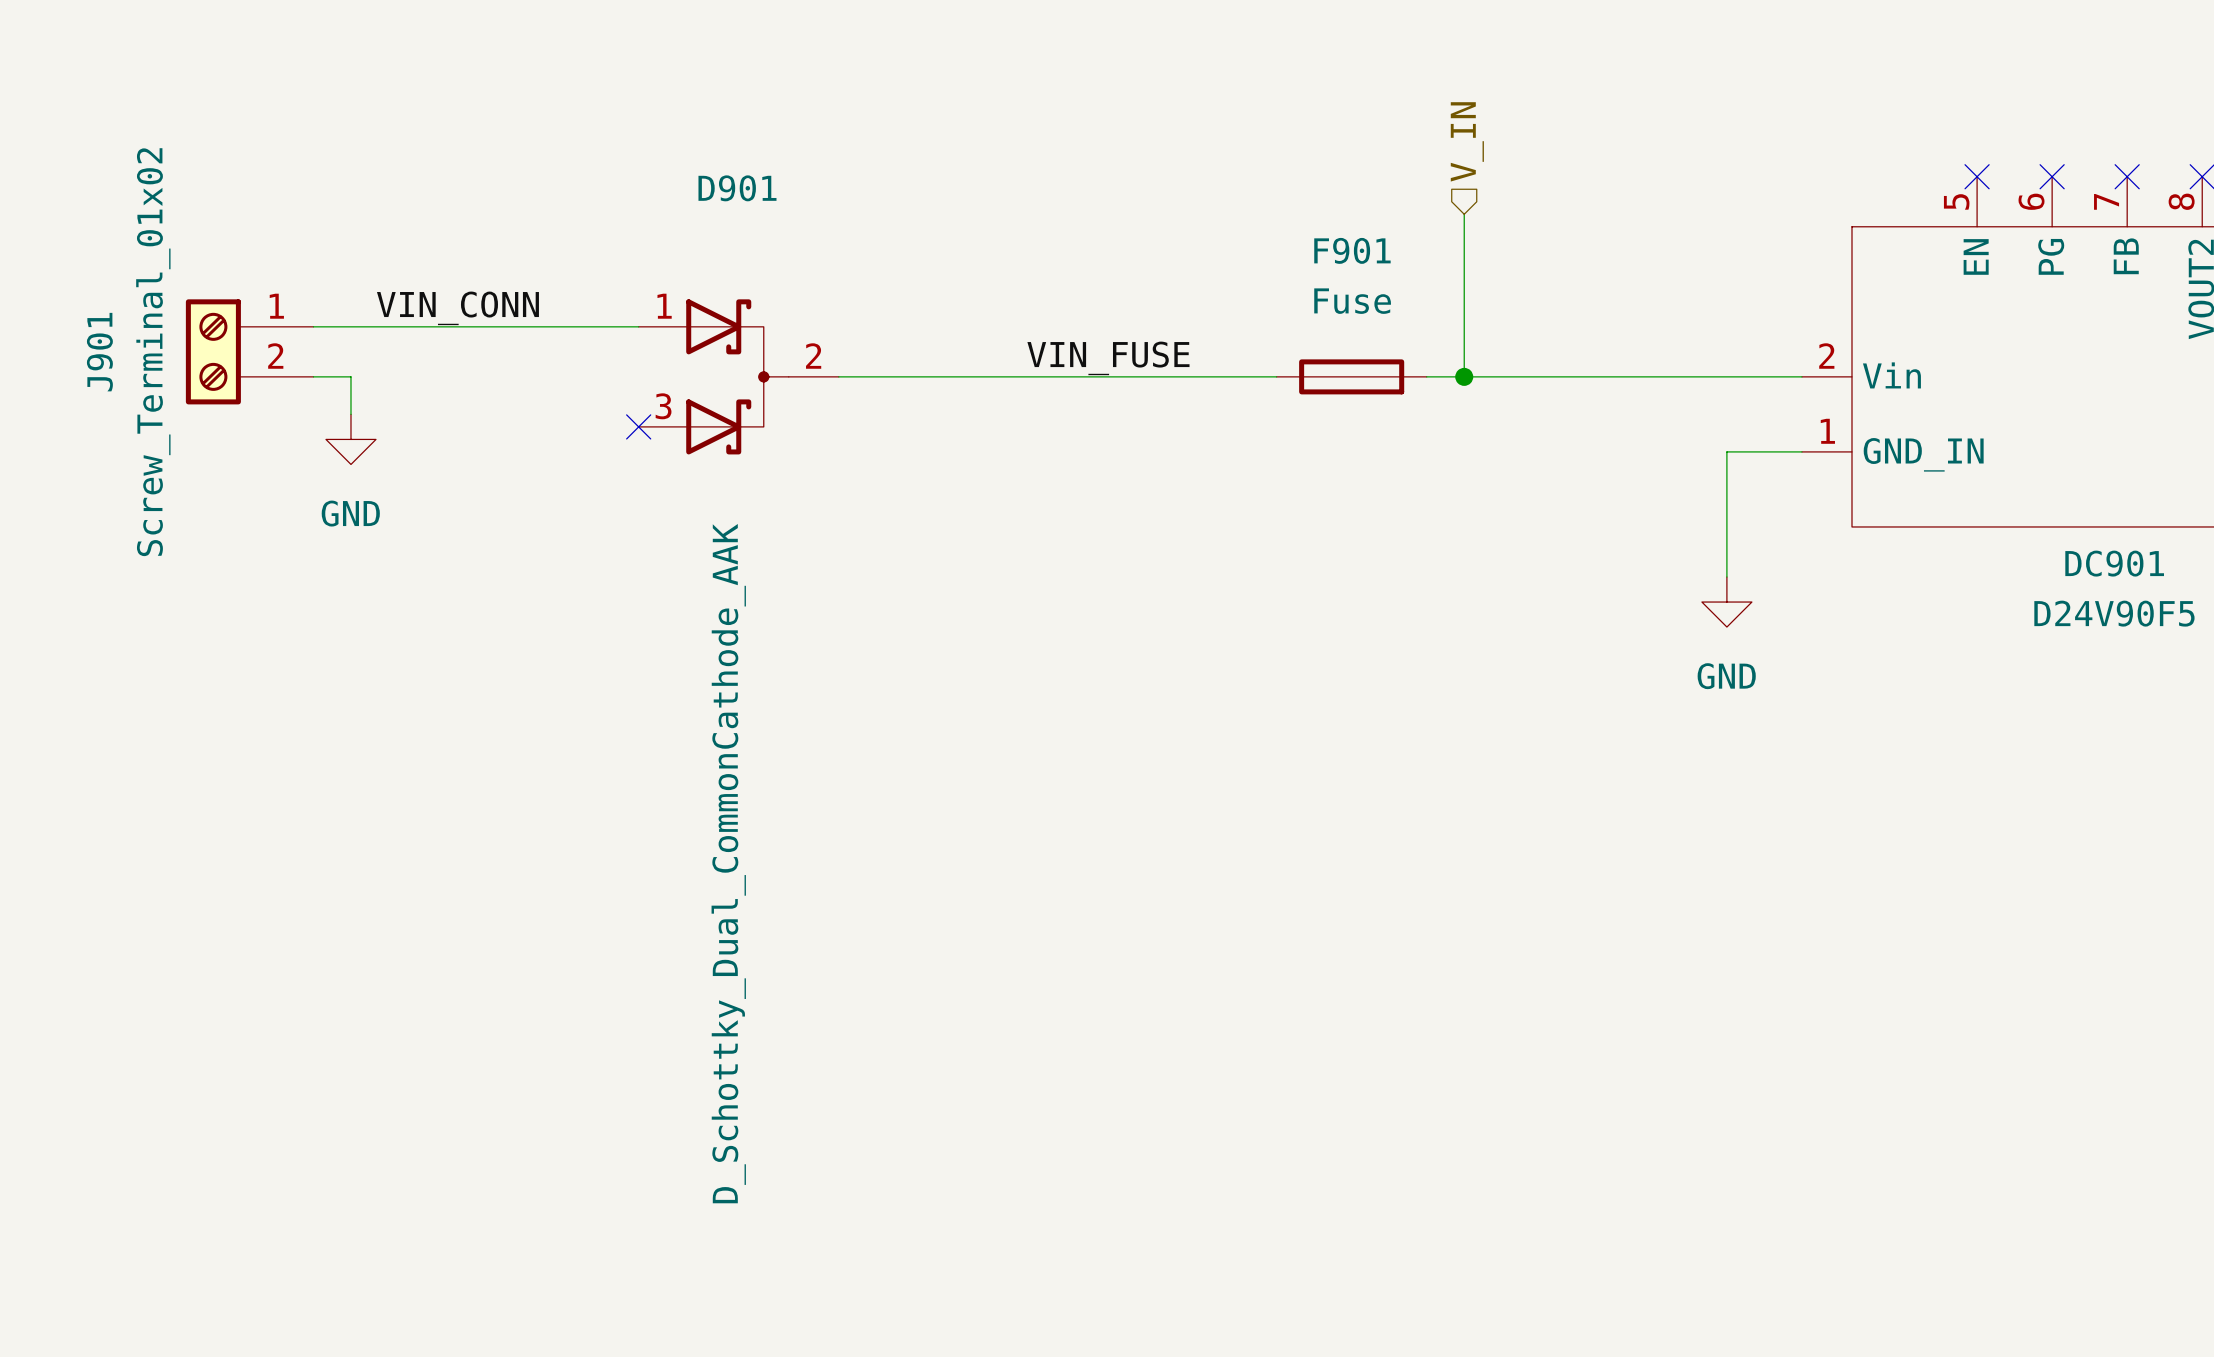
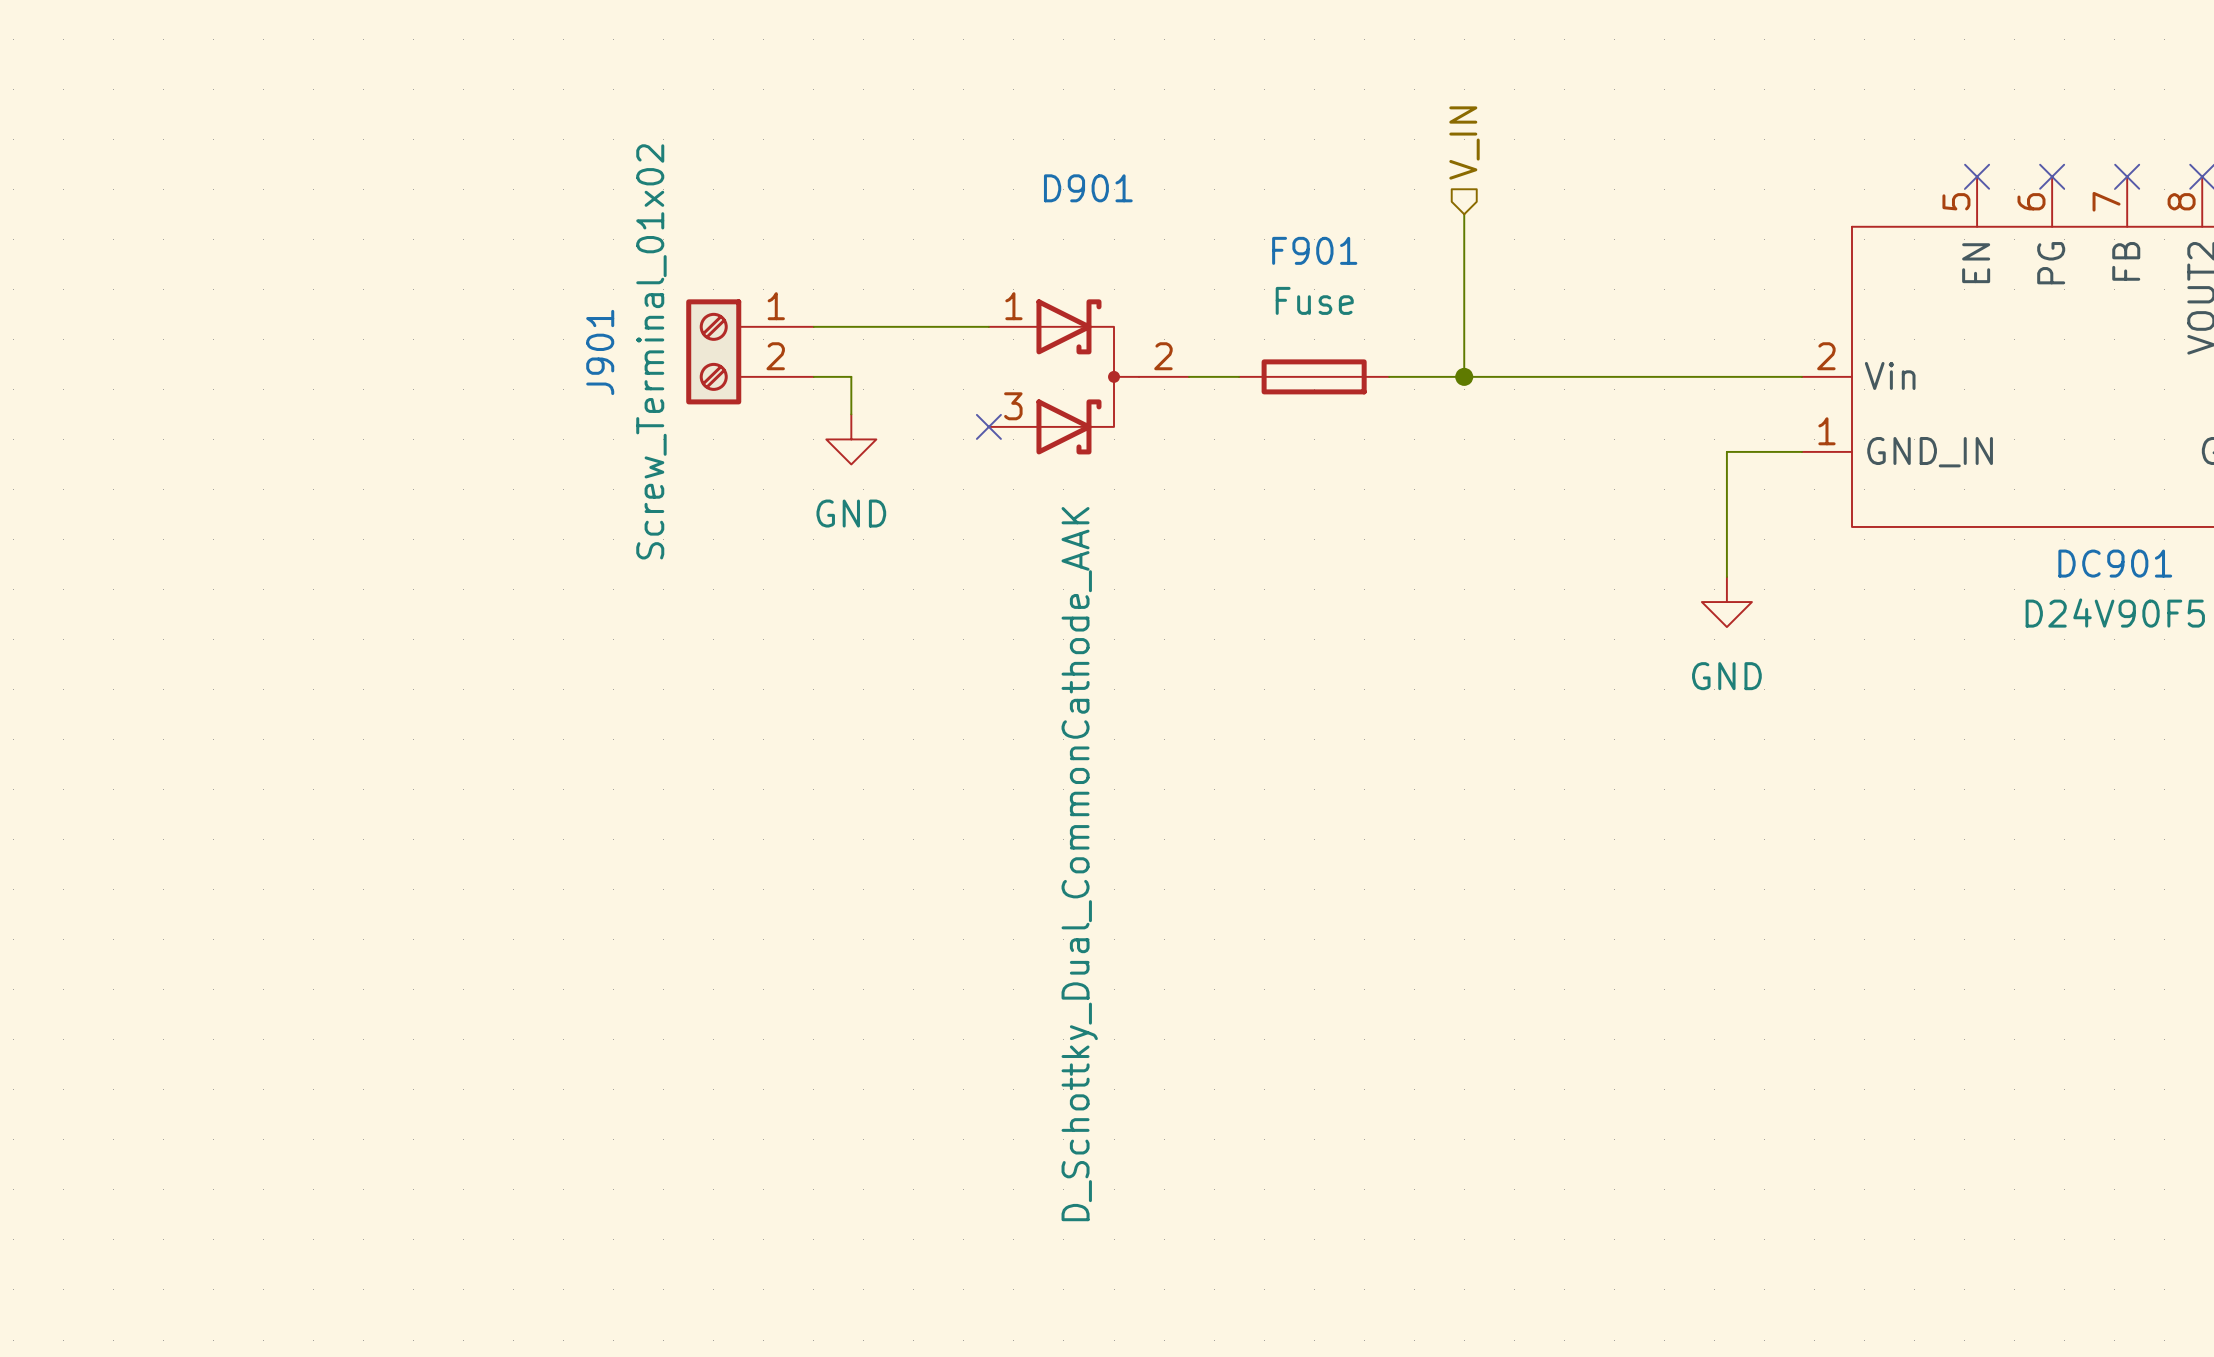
label: VIN_CONN (457, 308) -> none
wire: (313, 326) (638, 326) -> none
wire: none -> (813, 326) (988, 326)
J901 position: (249, 351) -> (750, 351)
label: VIN_FUSE (1108, 358) -> none
wire: (313, 376) (350, 376) (350, 414) -> none
D901 position: (738, 376) -> (1088, 376)
wire: (851, 376) (1189, 376) -> (851, 376) (851, 414)
F901 position: (1351, 376) -> (1314, 376)
no-connect mark: (638, 426) -> none
no-connect mark: none -> (988, 426)
power symbol: GND (350, 439) -> none
power symbol: none -> GND (851, 439)

